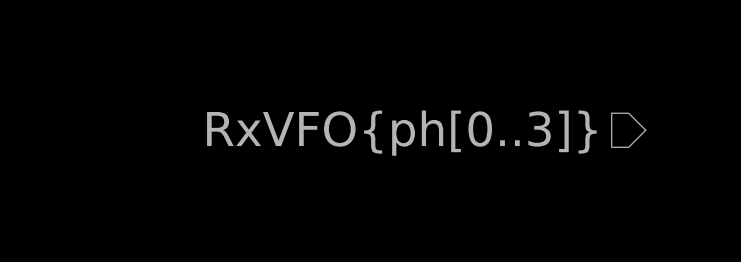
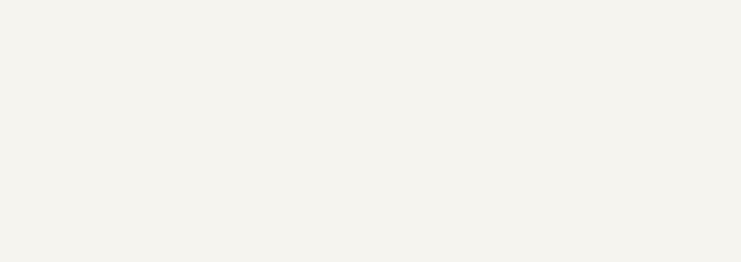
hierarchical label: RxVFO{ph[0..3]} (401, 133) -> none

